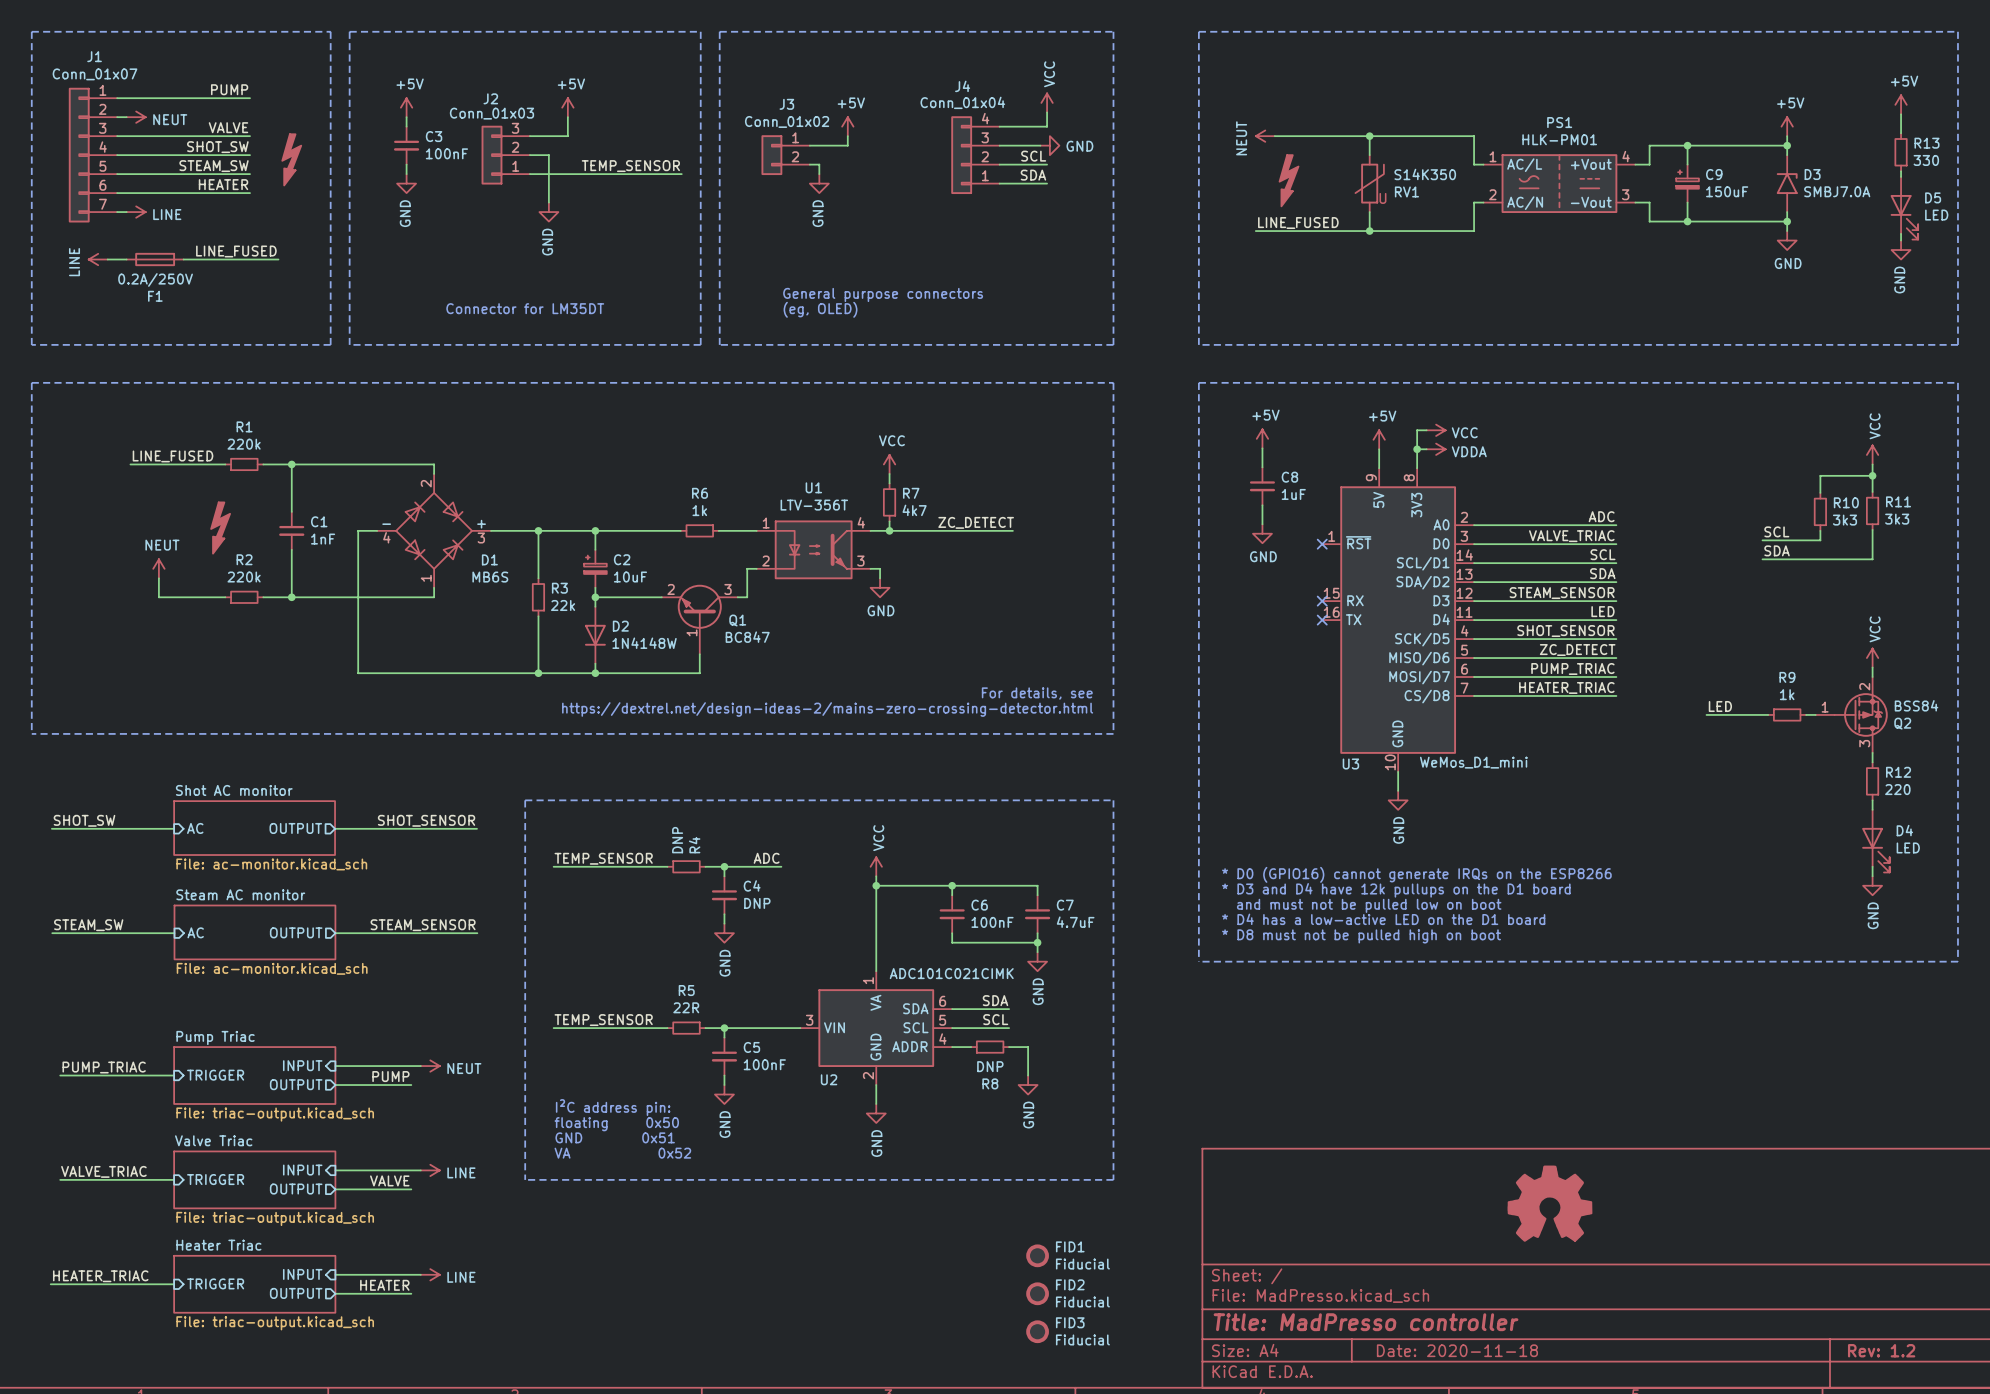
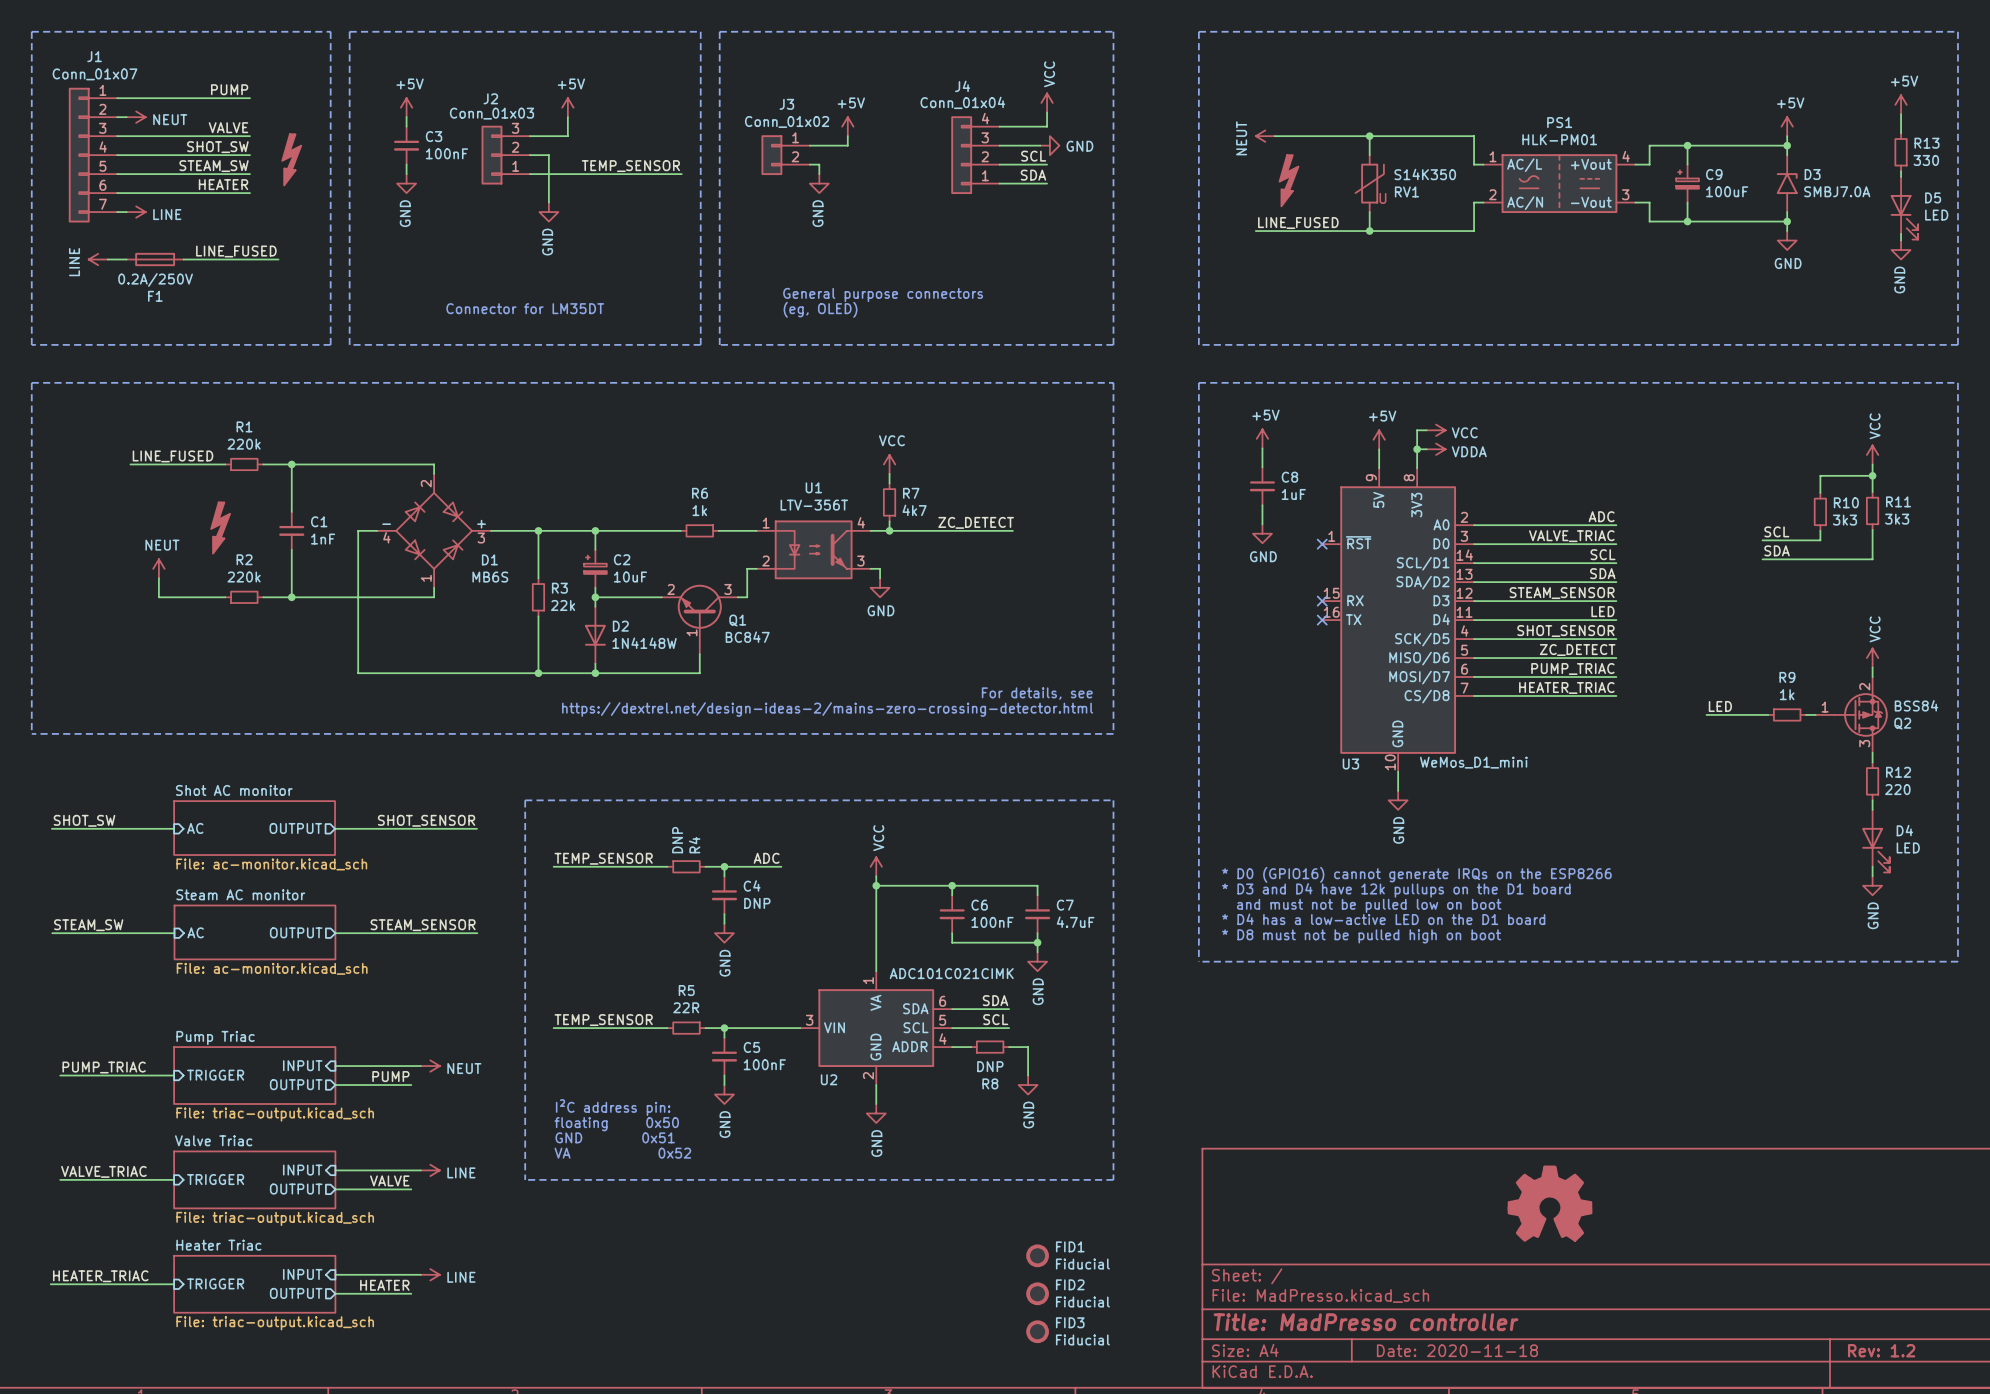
C9 value: 150uF (1727, 191) -> 100uF (1727, 191)

